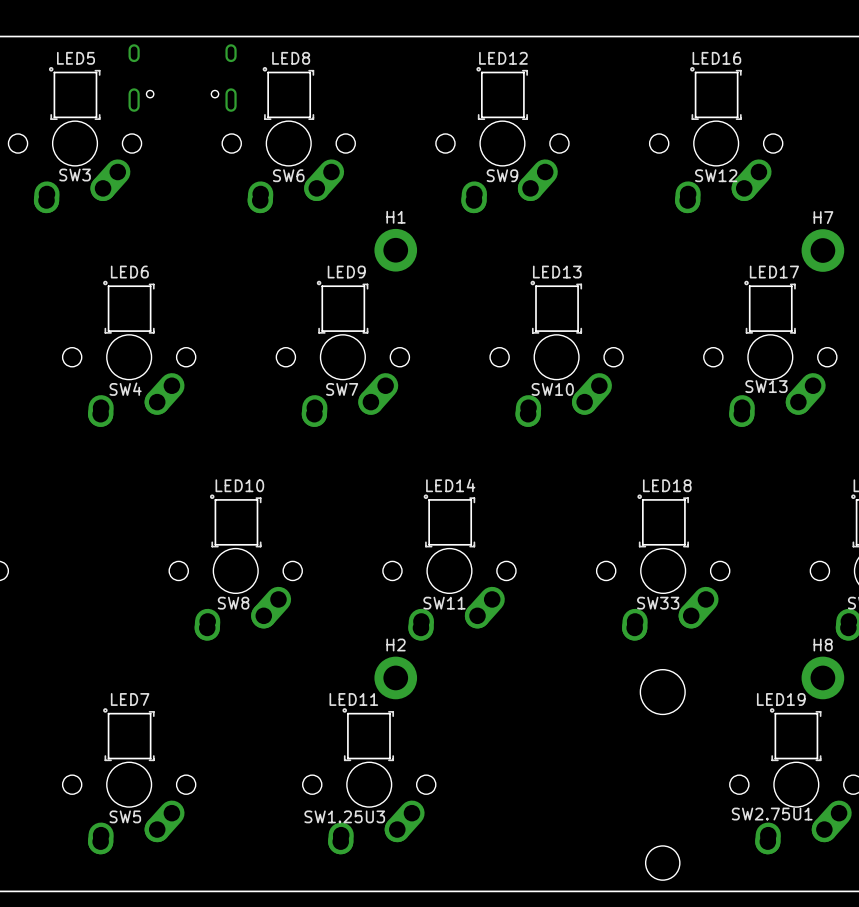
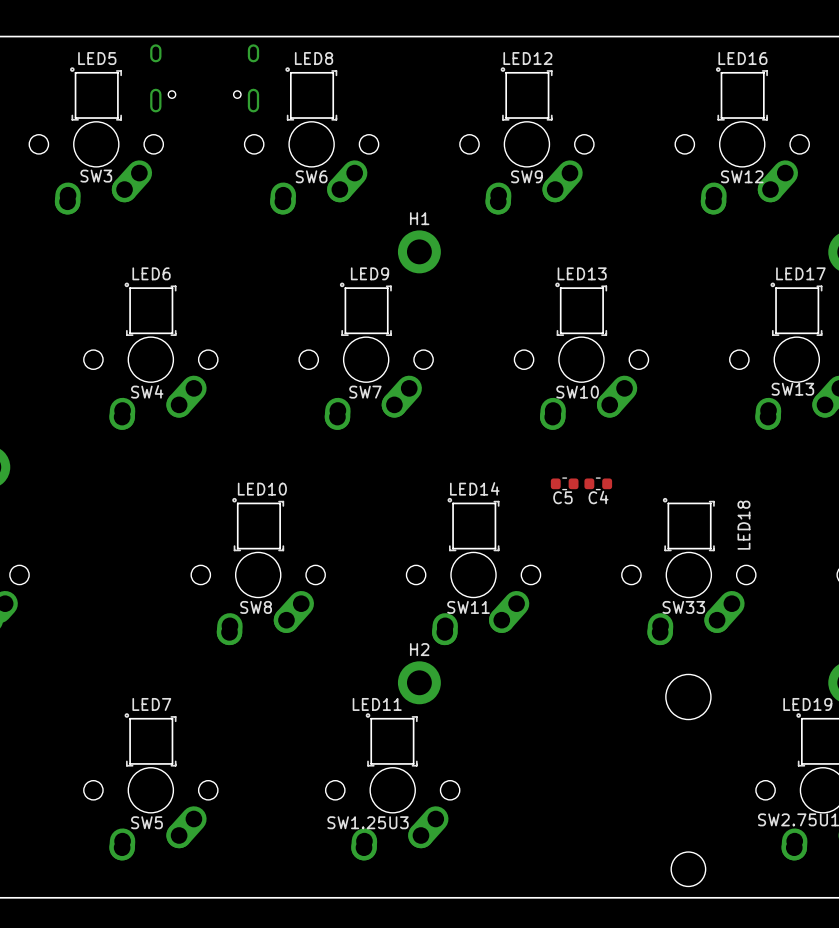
C5: none -> (564, 483)
C4: none -> (598, 483)
LED18 name rotation: 0° (667, 485) -> 90° counterclockwise (743, 525)
LED18 name position: LED18 (667, 485) -> LED18 (743, 525)

